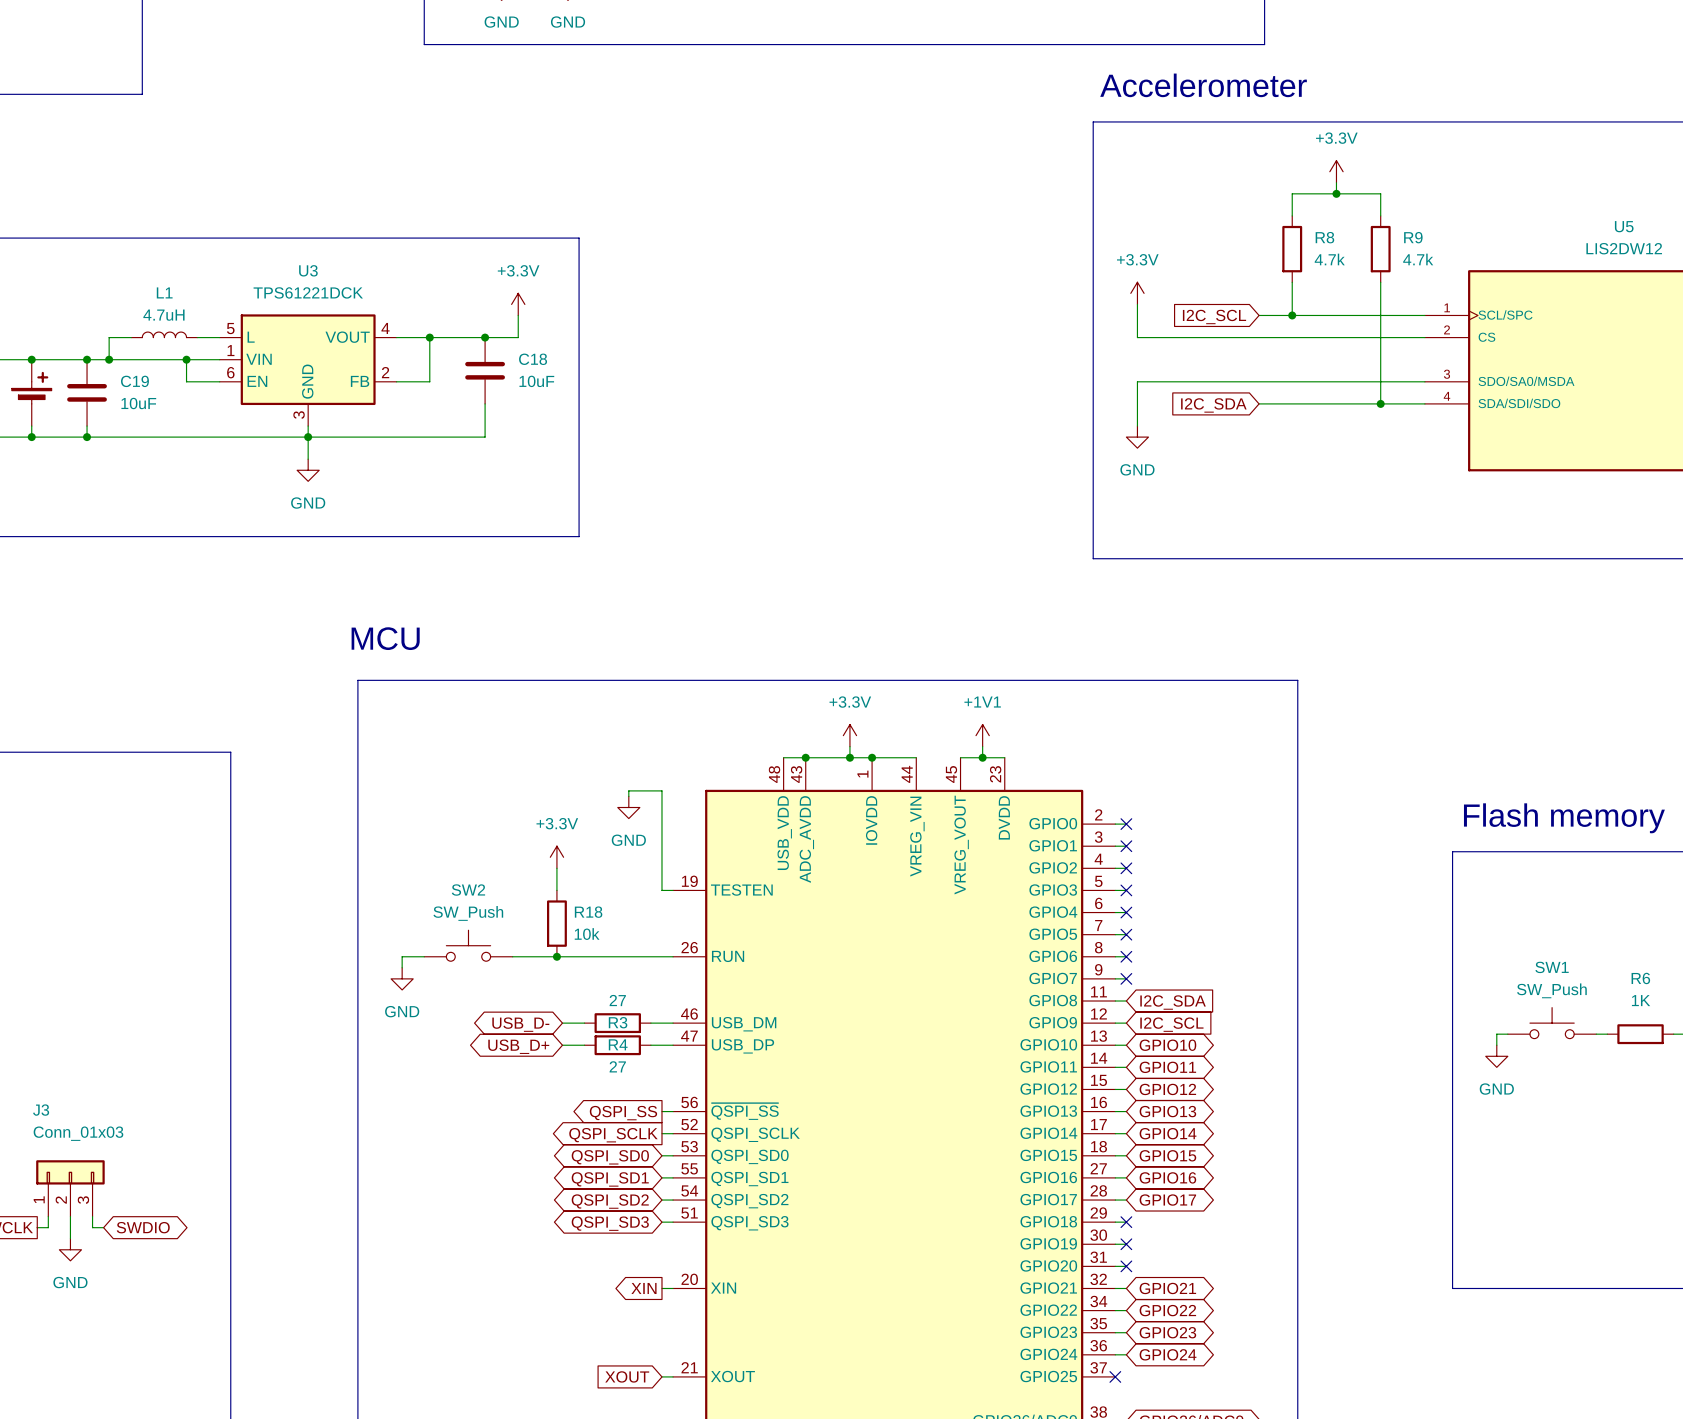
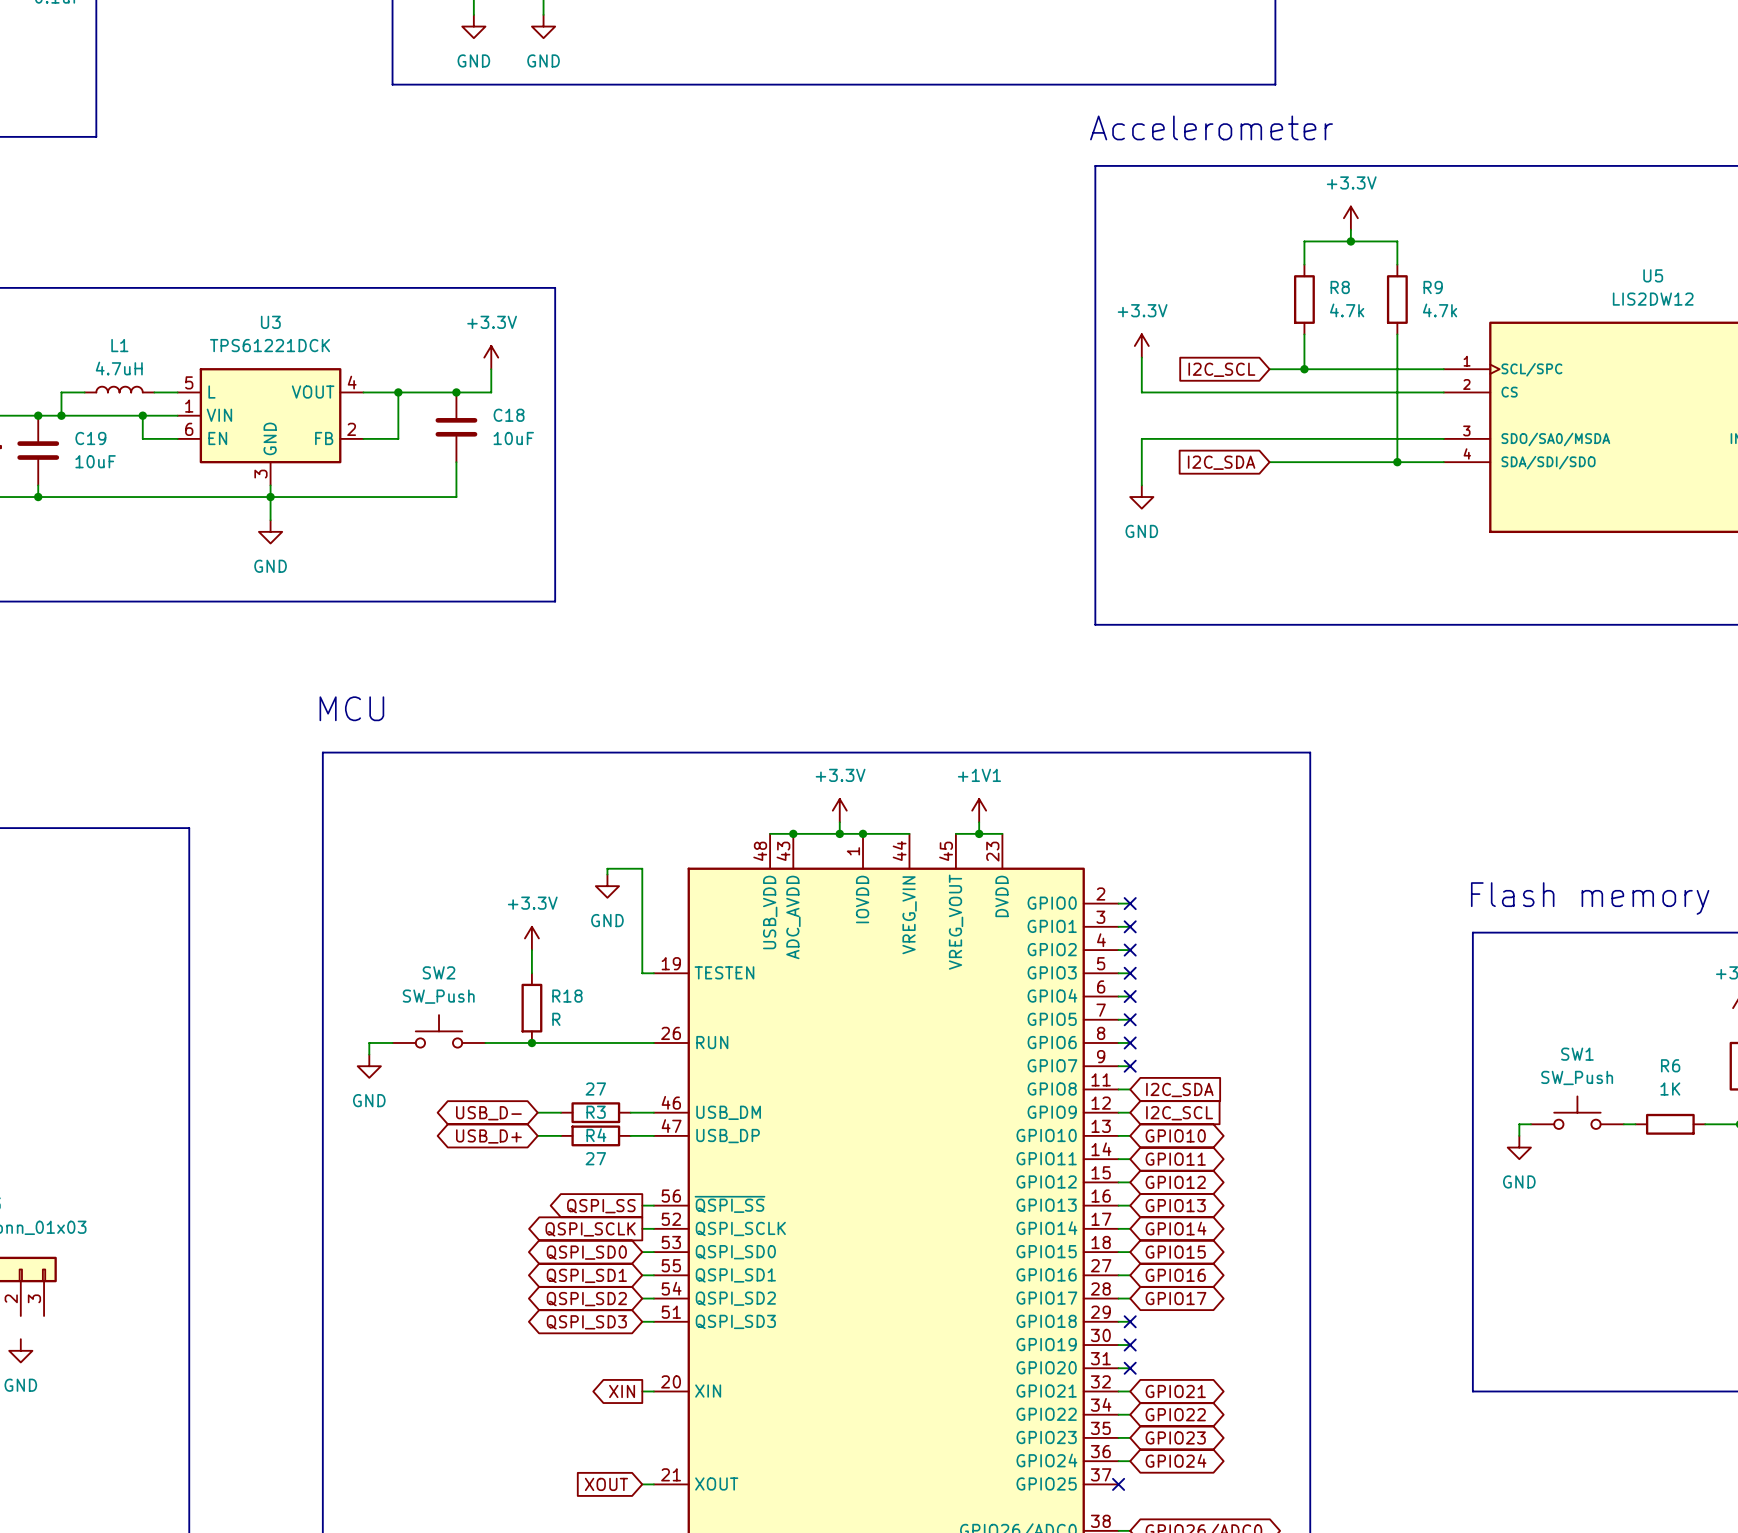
R18 value: 10k (587, 934) -> R (556, 1019)
wire: (70, 1216) (70, 1238) -> none
wire: (92, 1216) (92, 1227) (103, 1227) -> none
global label: SWDIO (143, 1227) -> none

